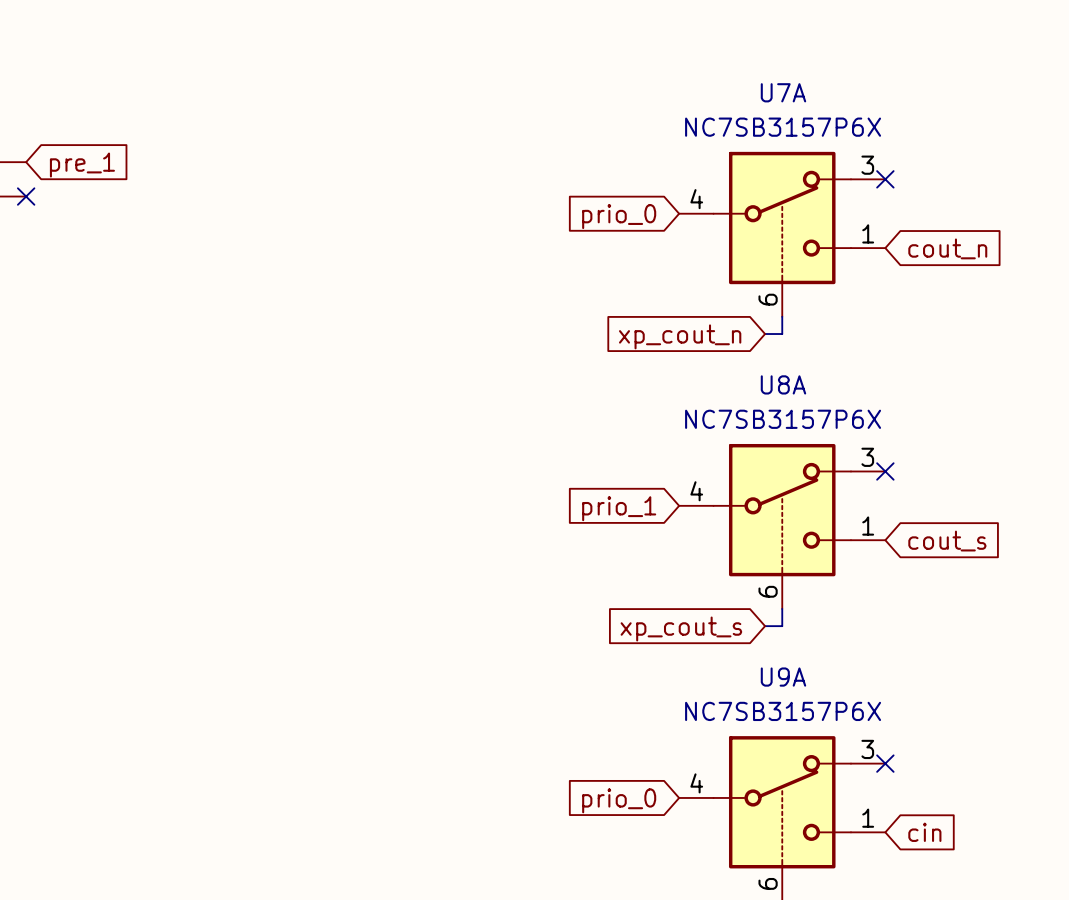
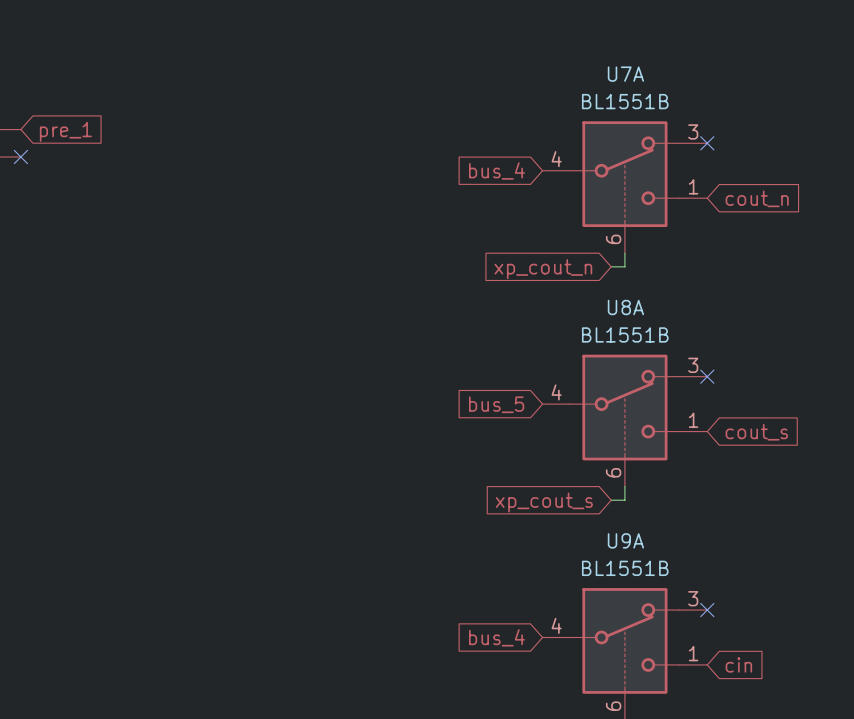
U7A value: NC7SB3157P6X (783, 127) -> BL1551B (625, 101)
global label: prio_0 (619, 216) -> bus_4 (496, 171)
U8A value: NC7SB3157P6X (783, 419) -> BL1551B (625, 334)
global label: prio_1 (619, 508) -> bus_5 (496, 404)
U9A value: NC7SB3157P6X (783, 711) -> BL1551B (625, 568)
global label: prio_0 (619, 800) -> bus_4 (496, 637)

